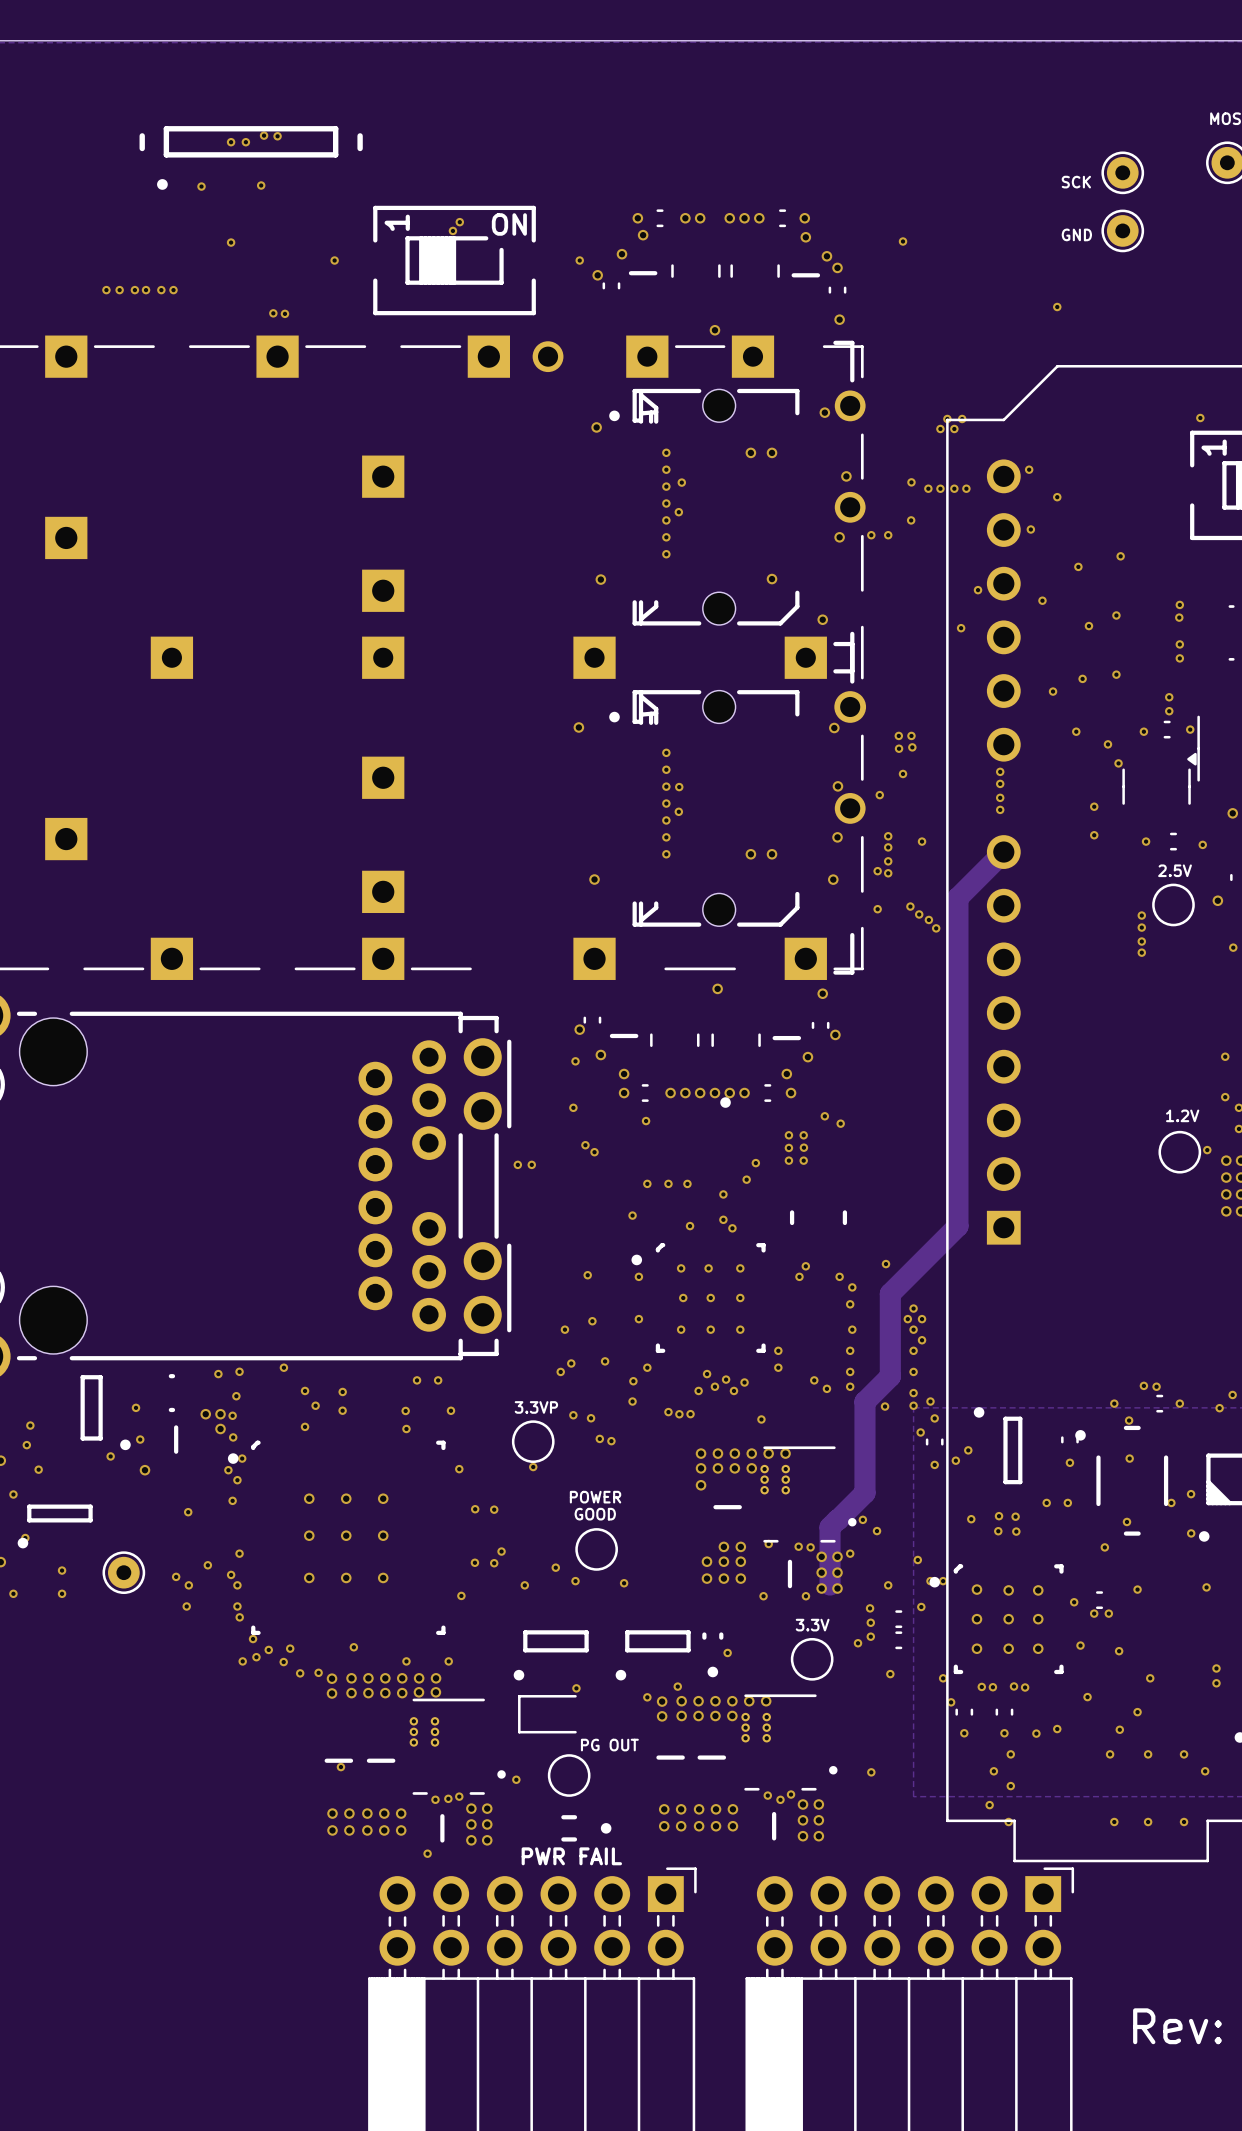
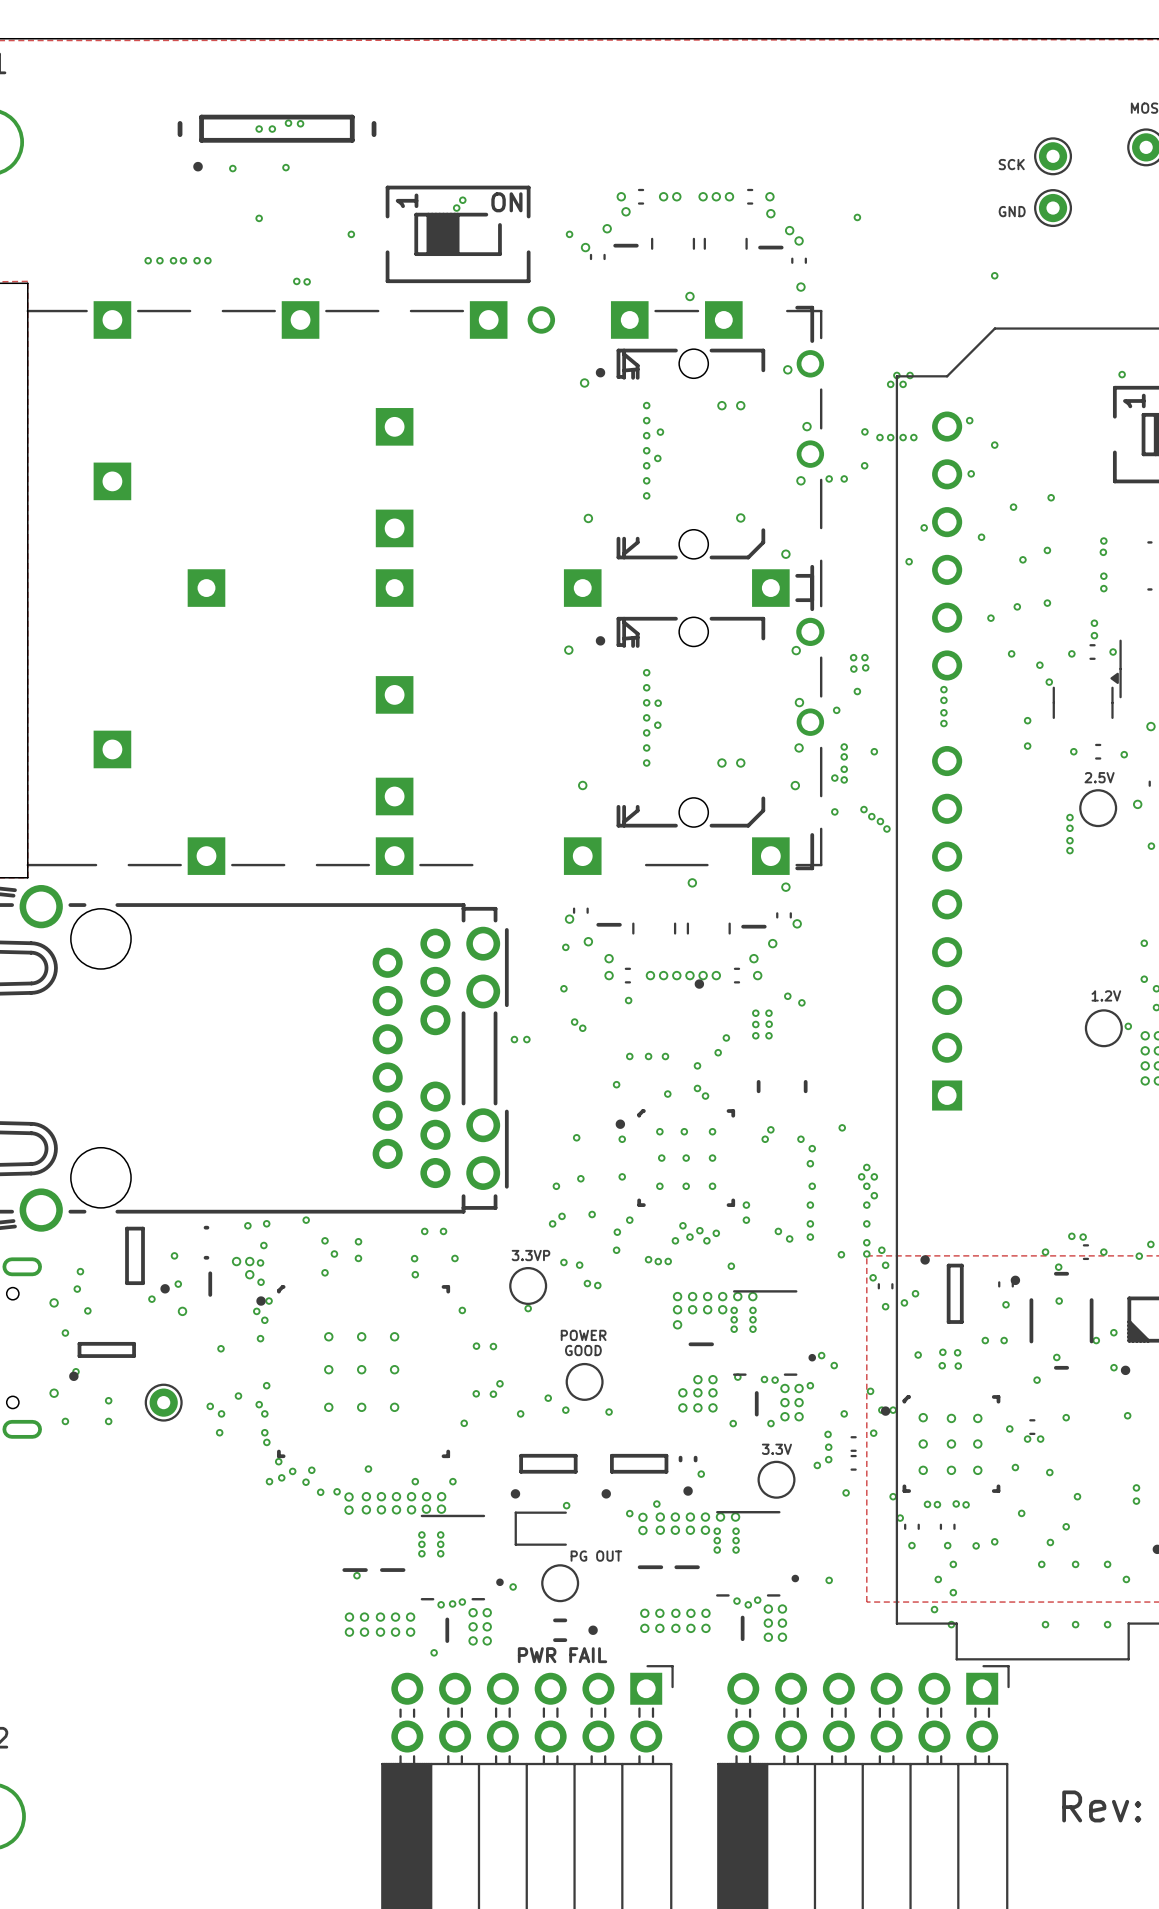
track: (1003, 852) (957, 897) (957, 1226) (890, 1293) (890, 1376) (864, 1401) (864, 1492) (830, 1527) (830, 1585) -> none

